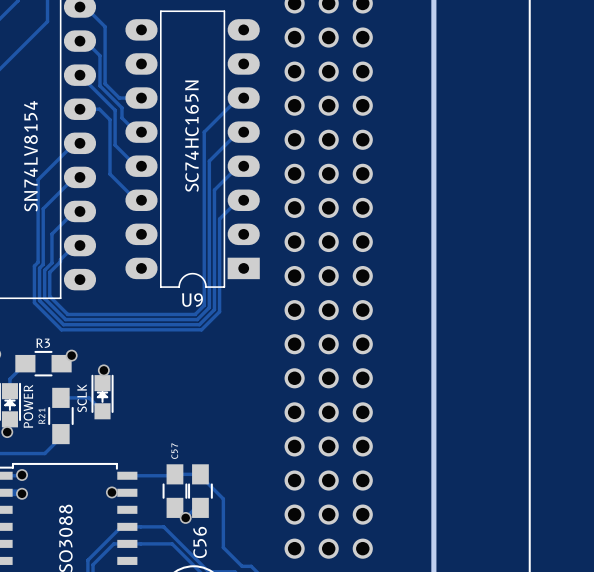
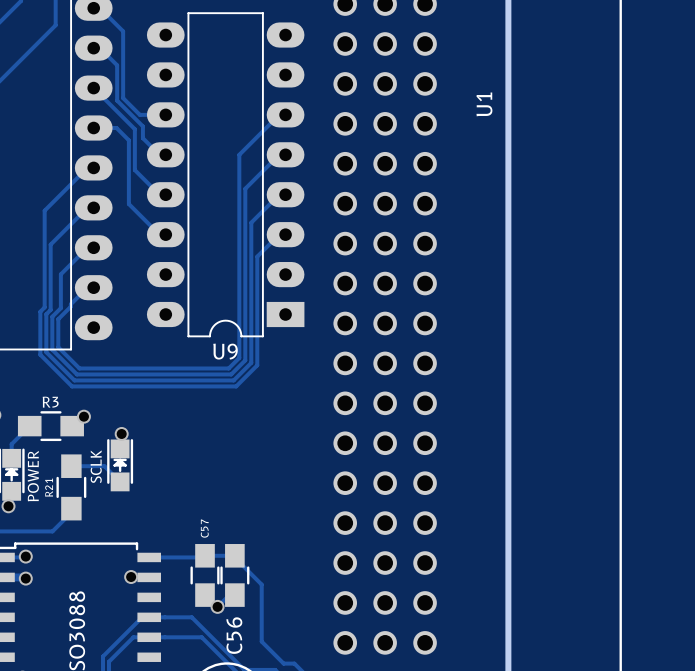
U1 name: none -> U1 (484, 104)
U9 value: SC74HC165N (191, 136) -> none
part value: SN74LV8154 (31, 156) -> none

